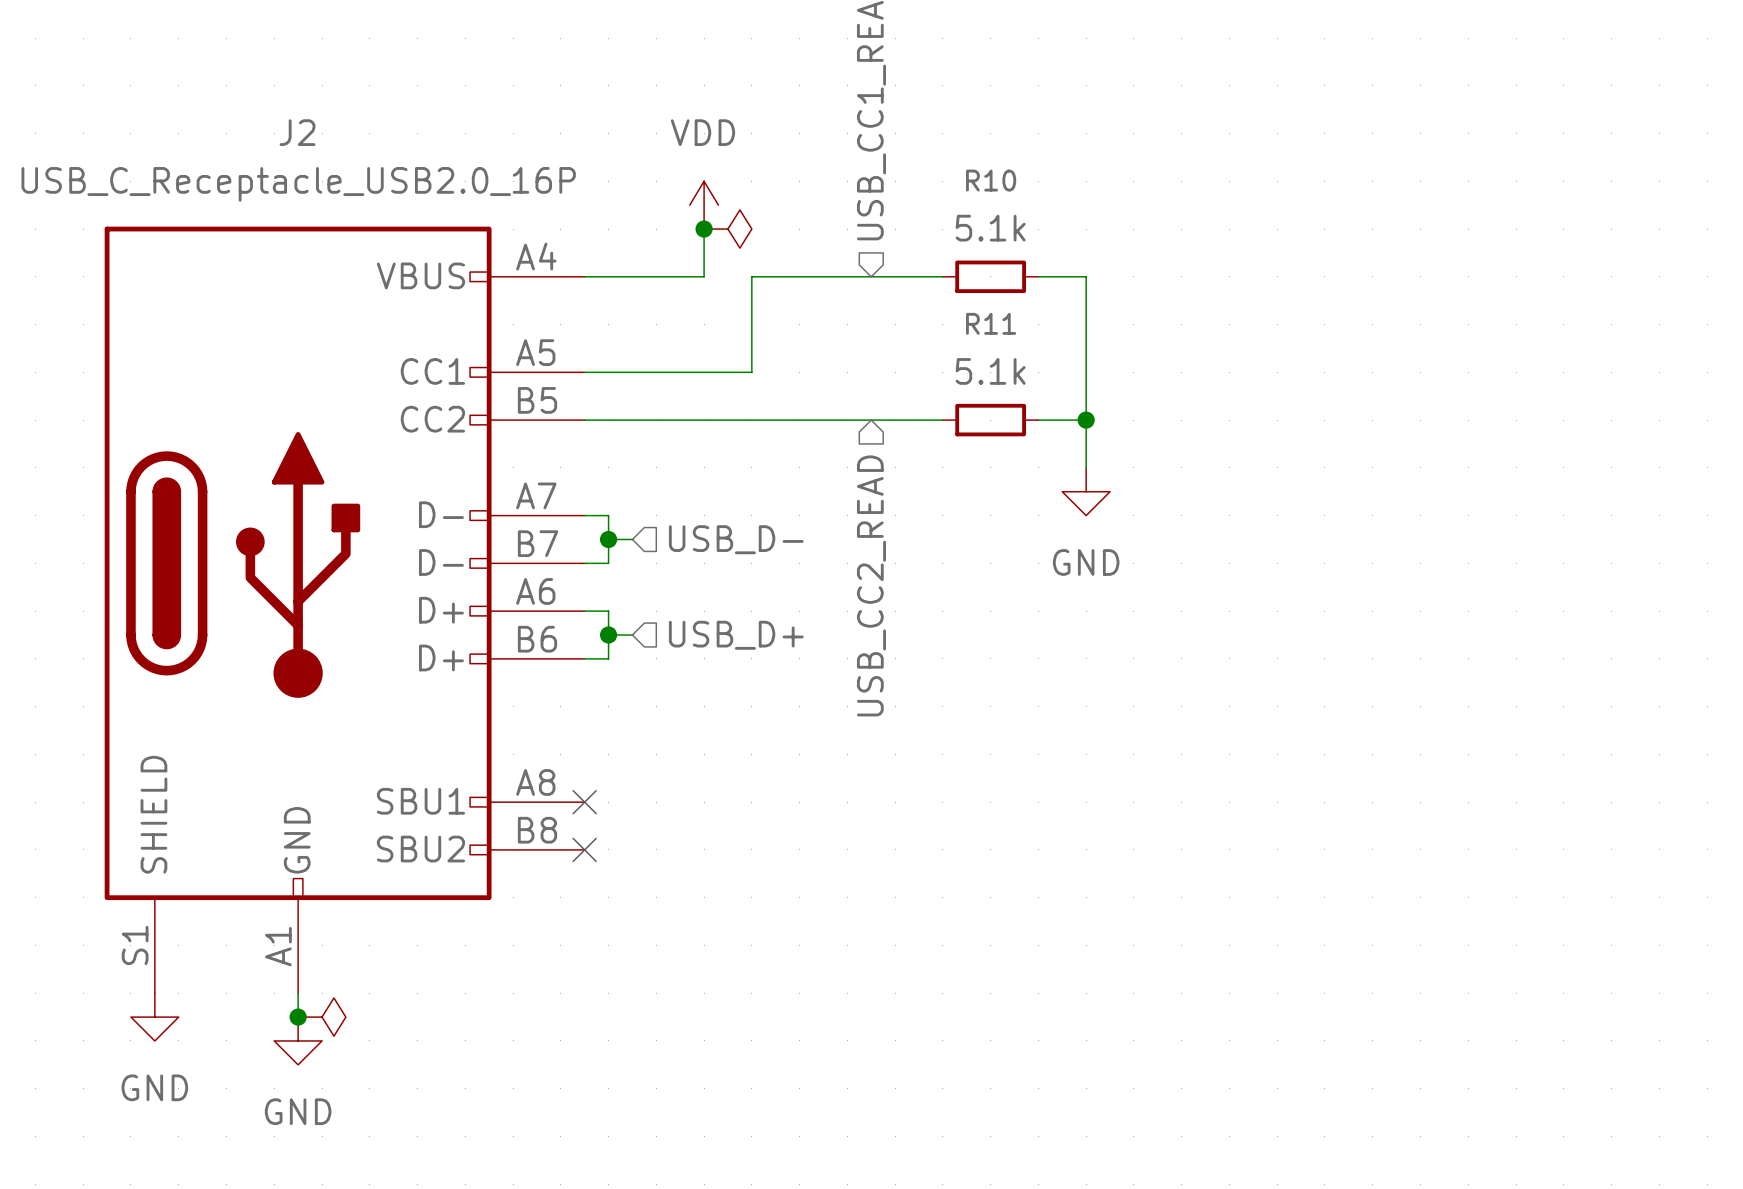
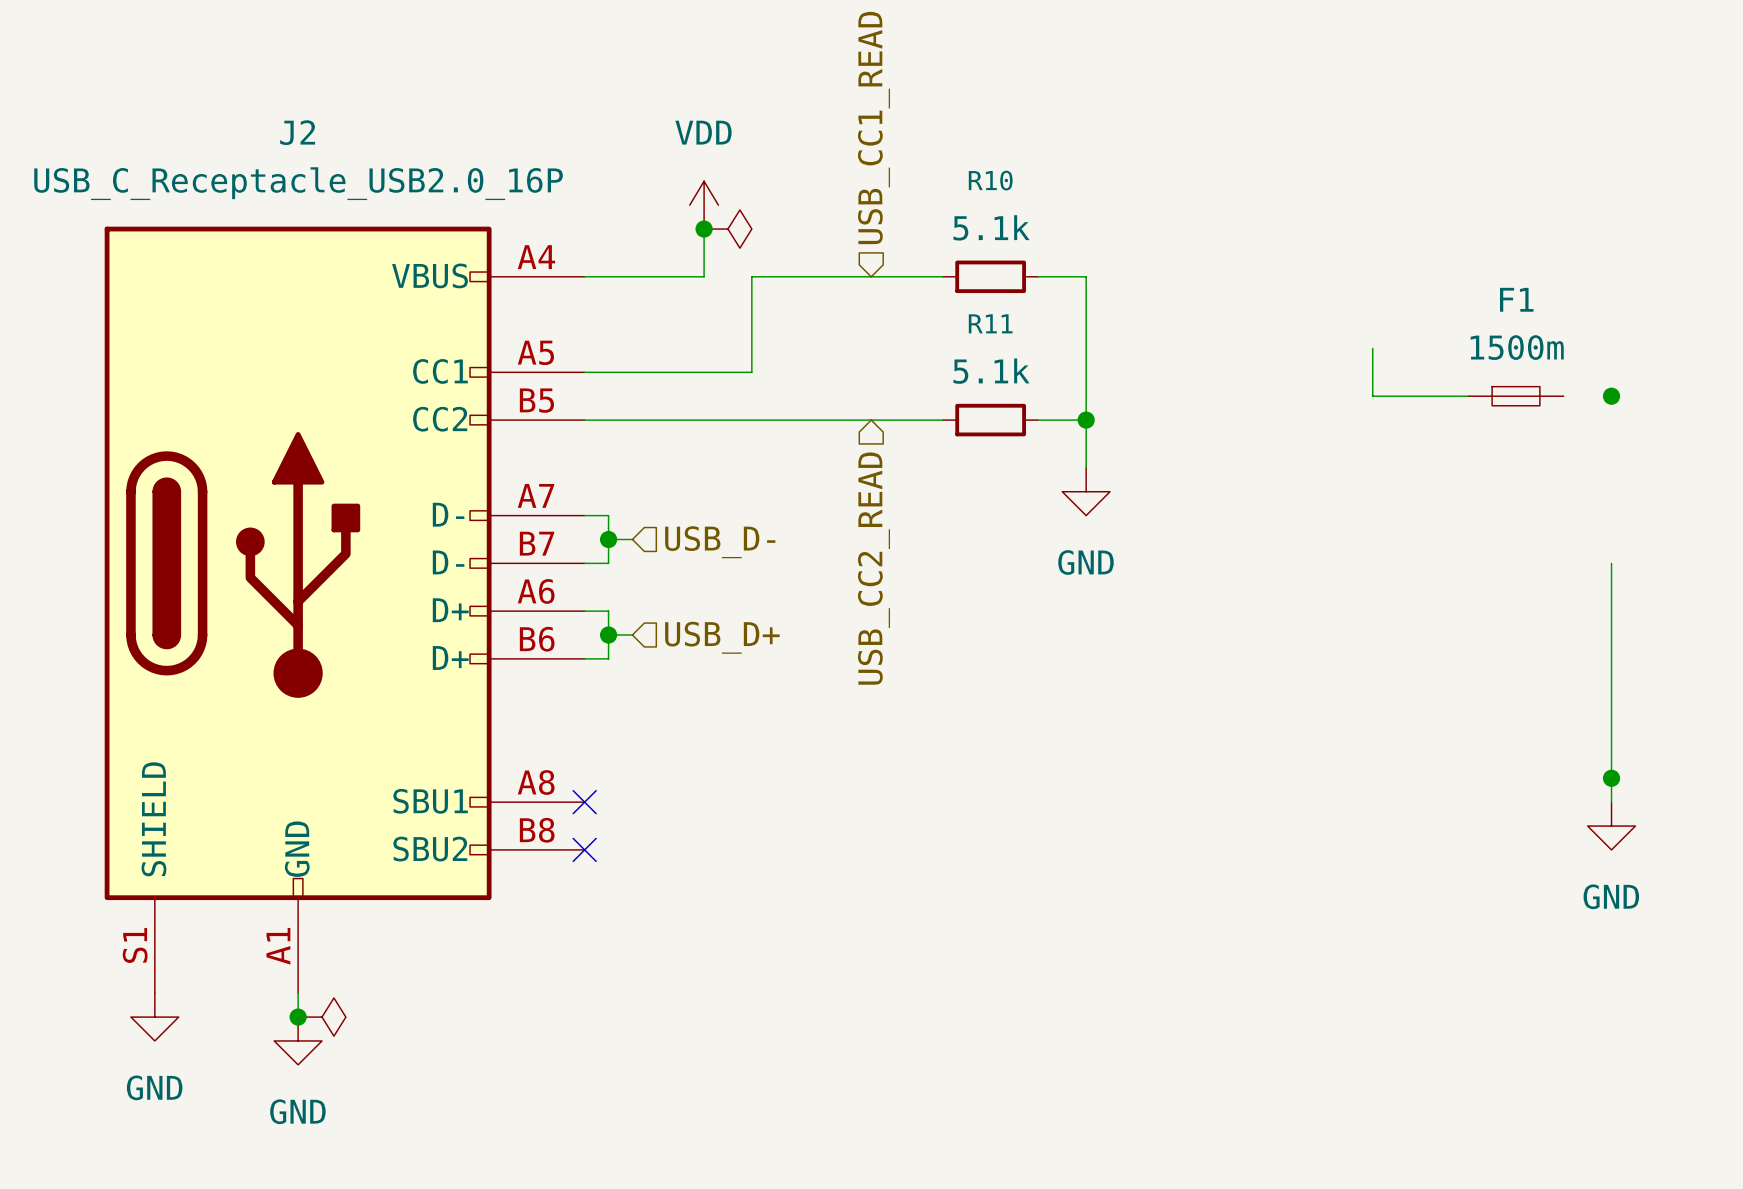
wire: none -> (1372, 348) (1372, 396) (1468, 396)
F1: none -> 1500m (1516, 396)
junction: none -> (1611, 396)
wire: none -> (1611, 563) (1611, 802)
junction: none -> (1611, 778)
power symbol: none -> GND (1611, 826)

